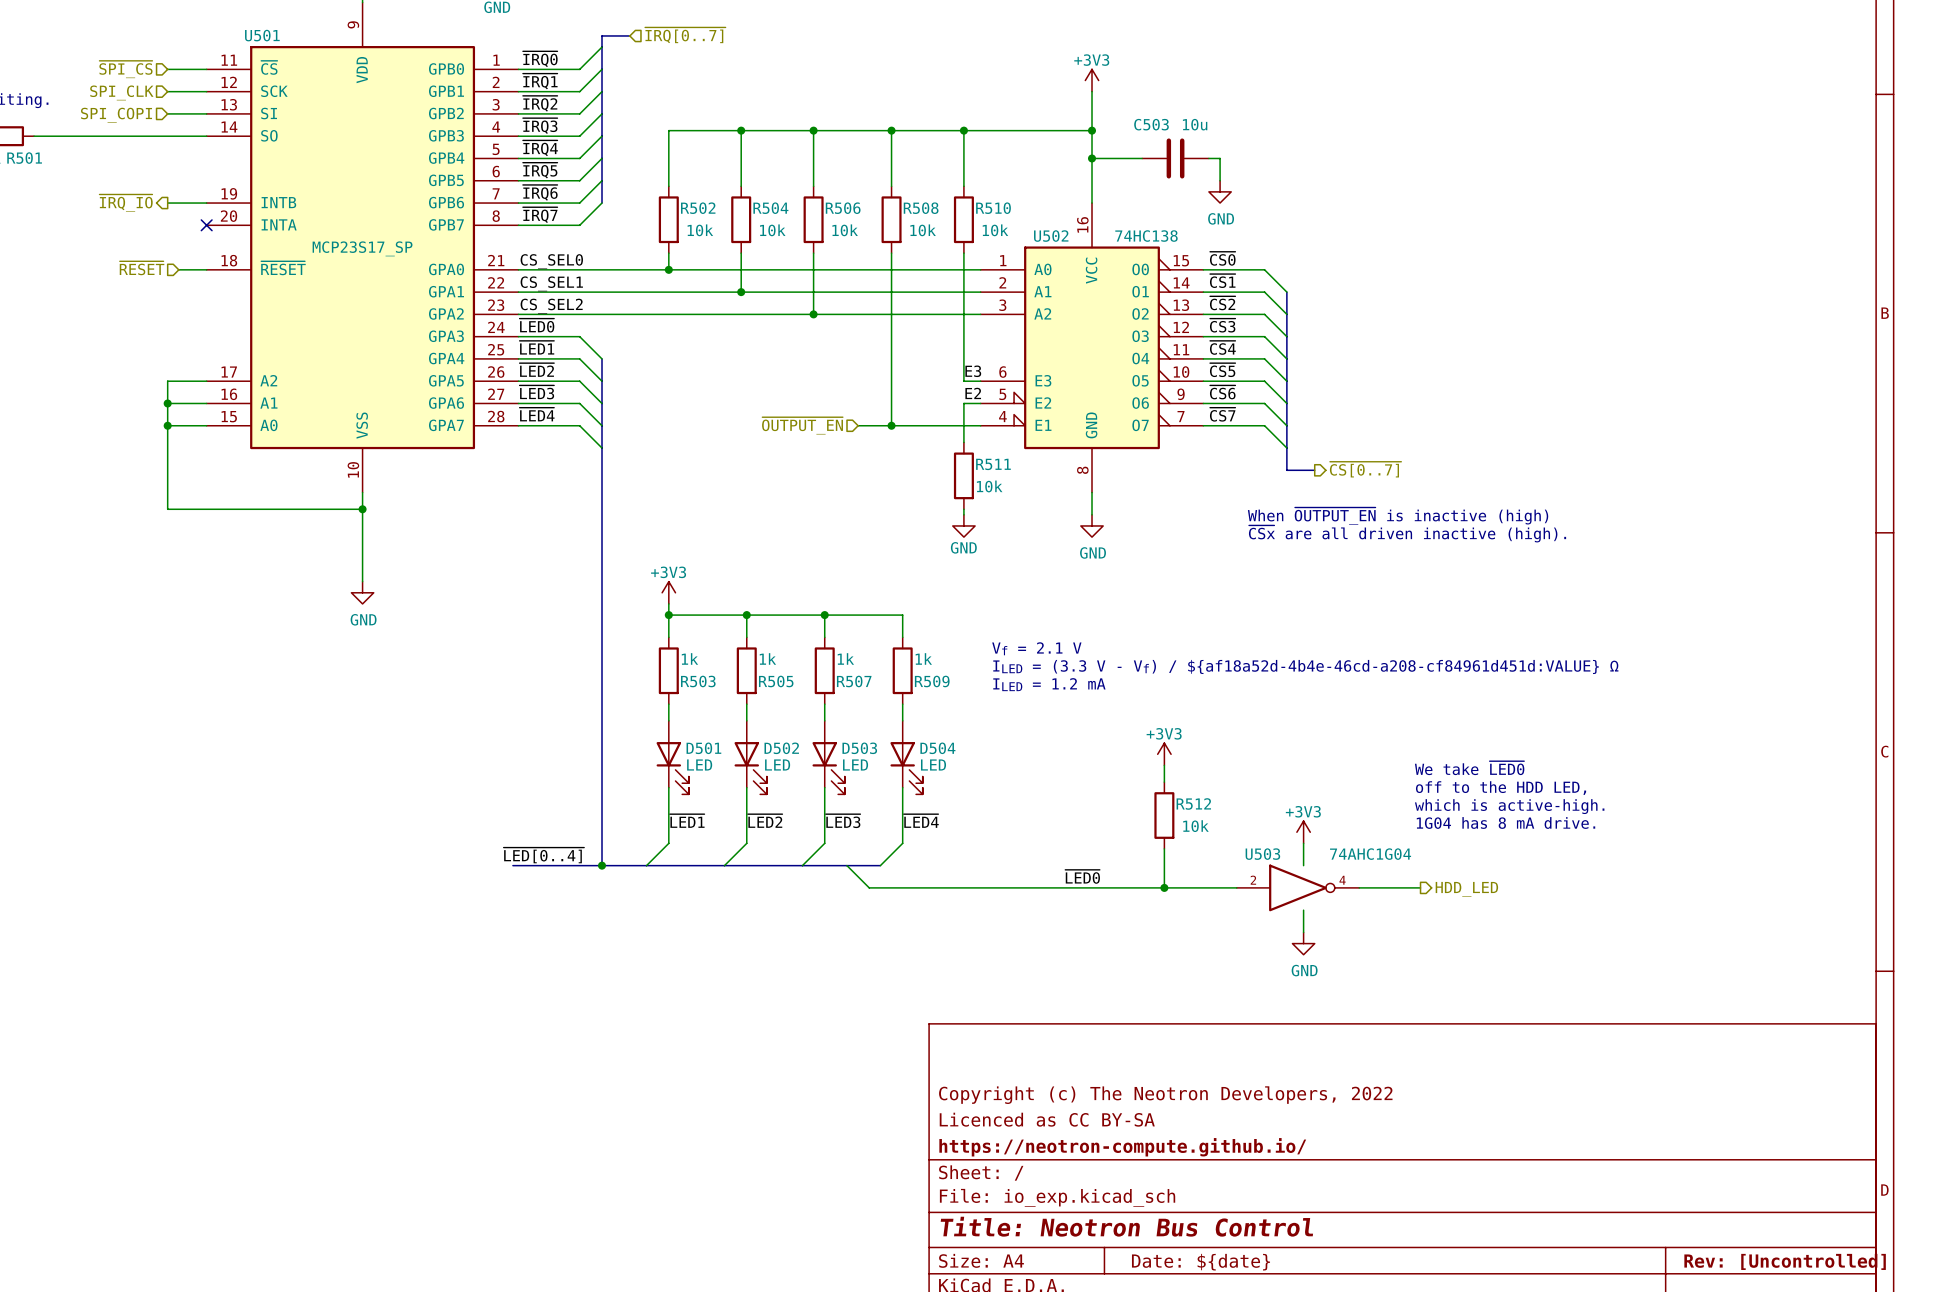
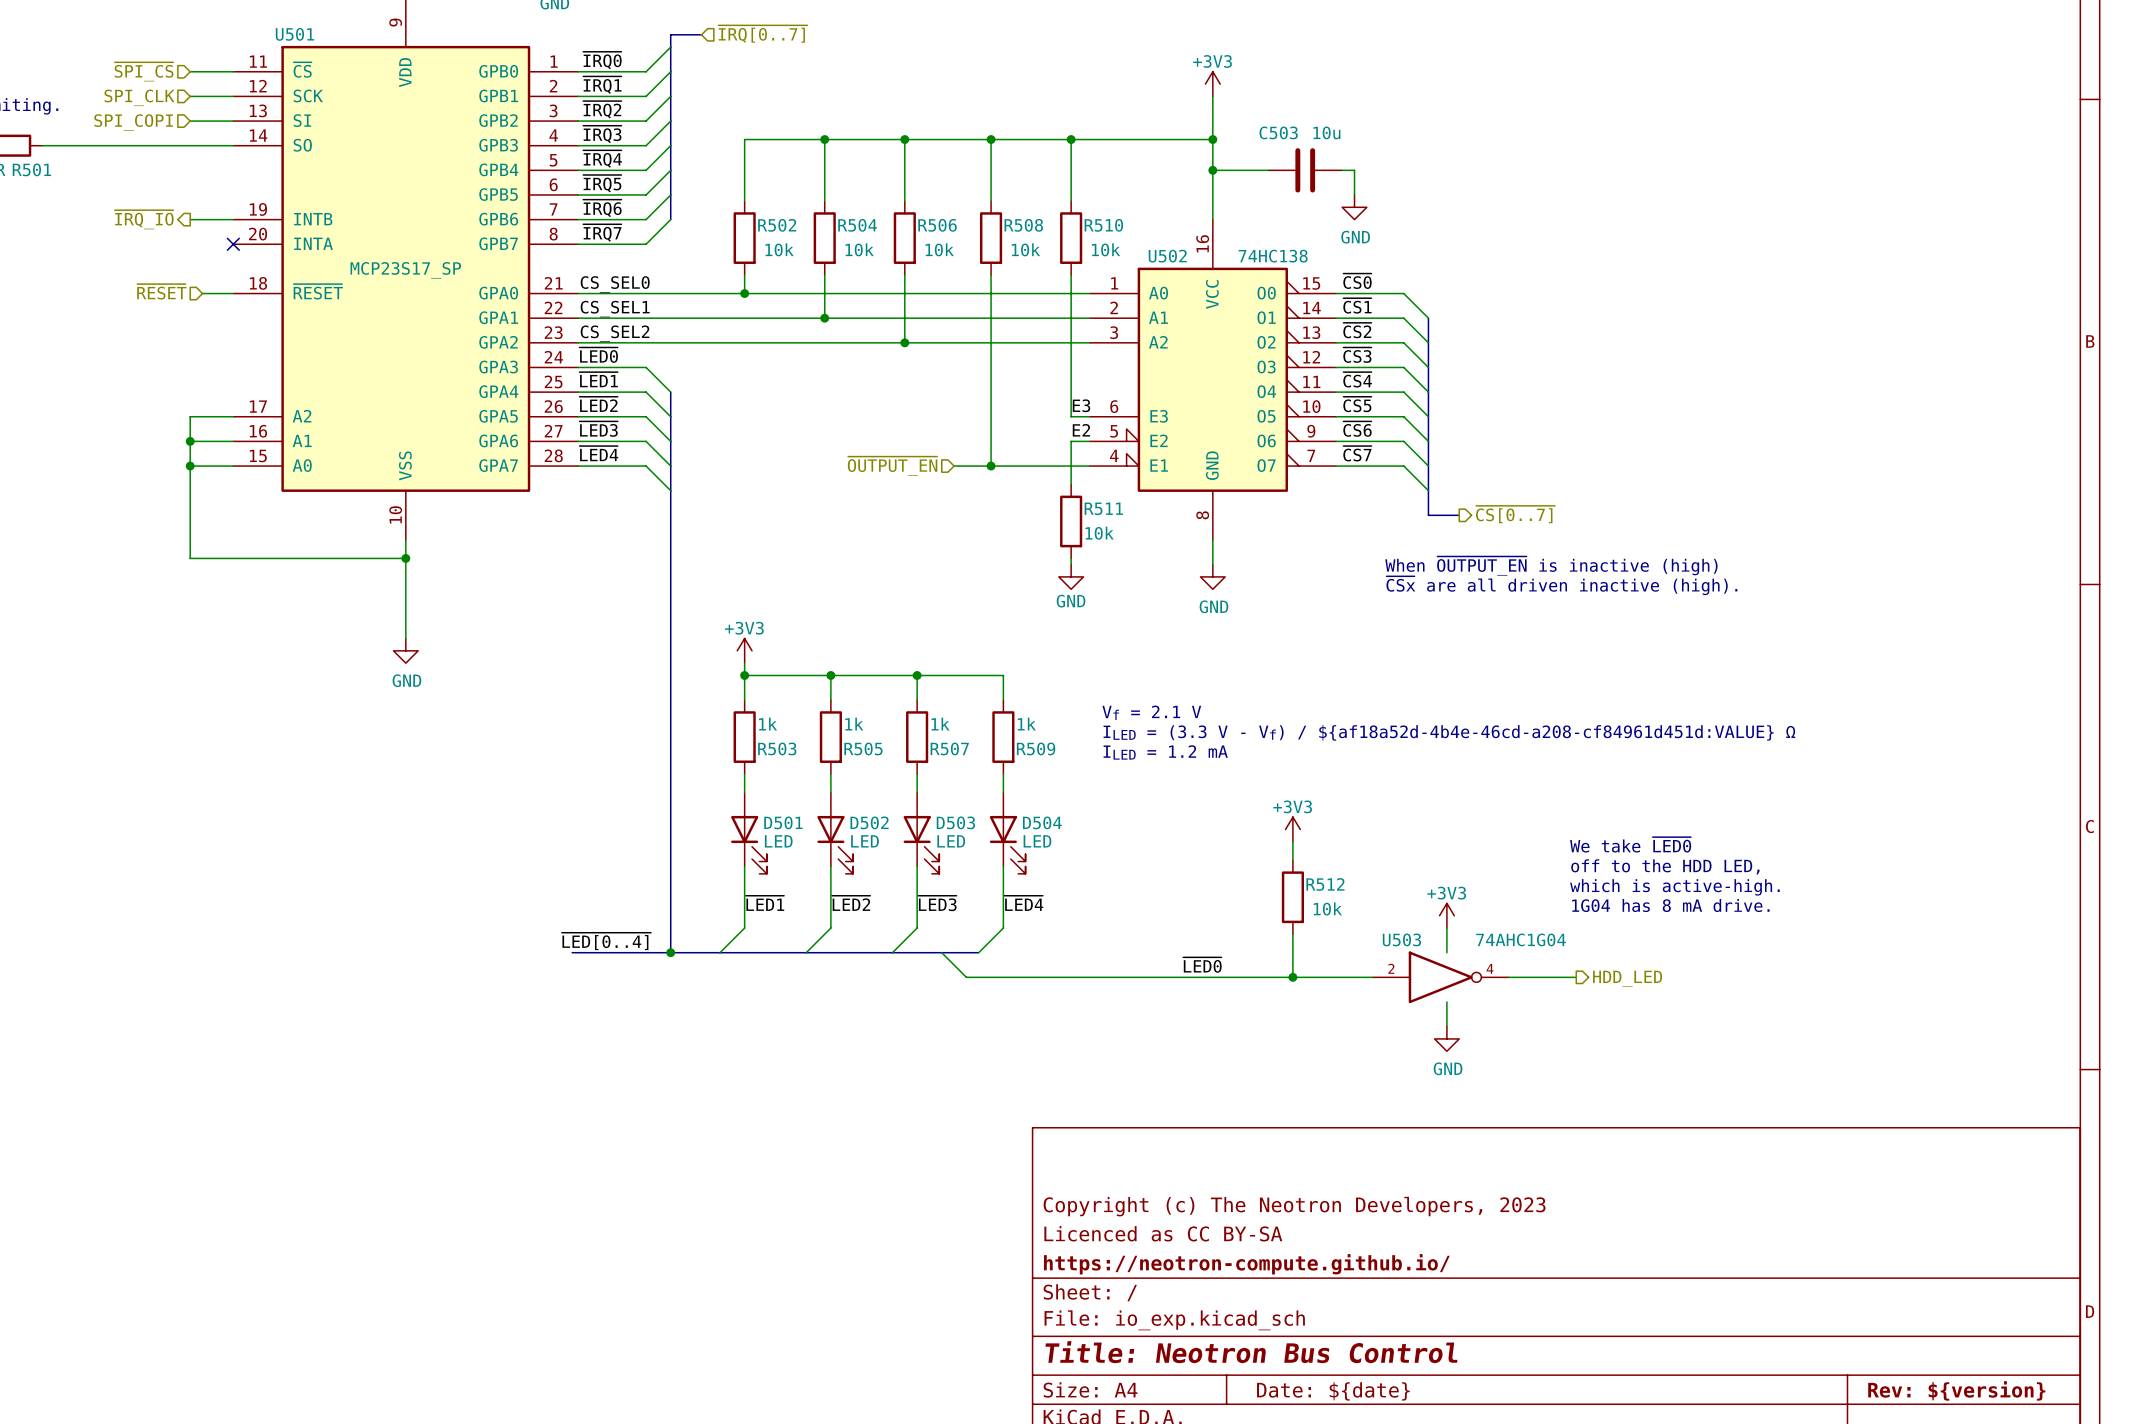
title block: Copyright (c) The Neotron Developers, 2022 (1165, 1095) -> Copyright (c) The Neotron Developers, 2023 (1294, 1206)
title block: Rev: [Uncontrolled] (1785, 1261) -> Rev: ${version} (1956, 1390)

